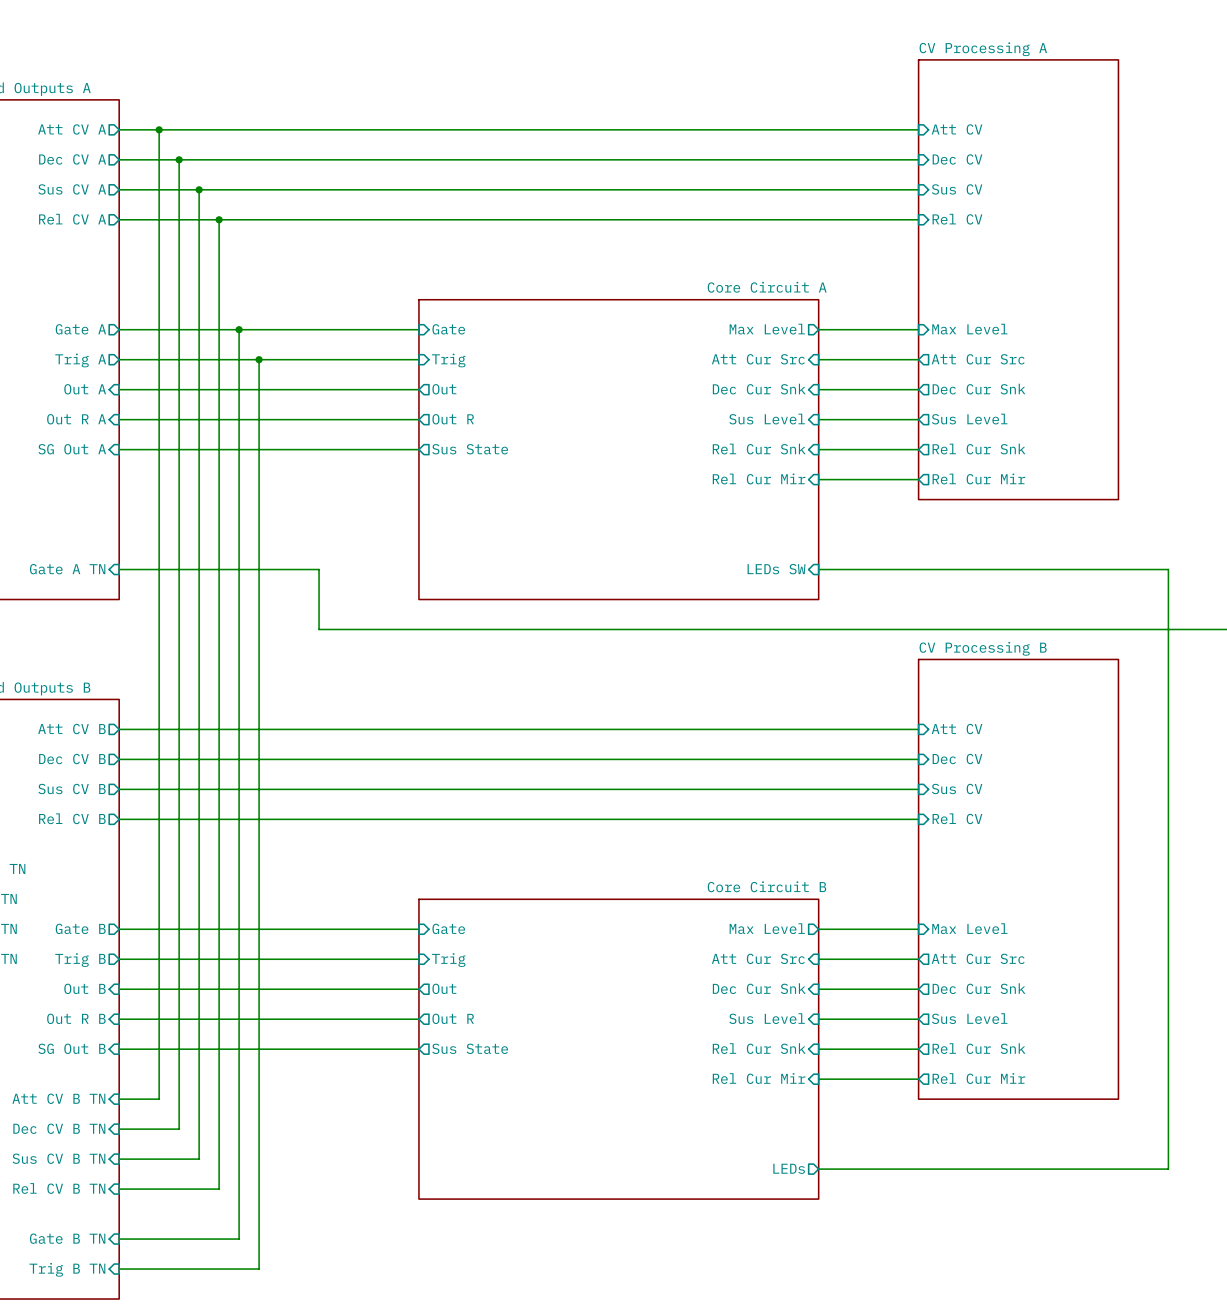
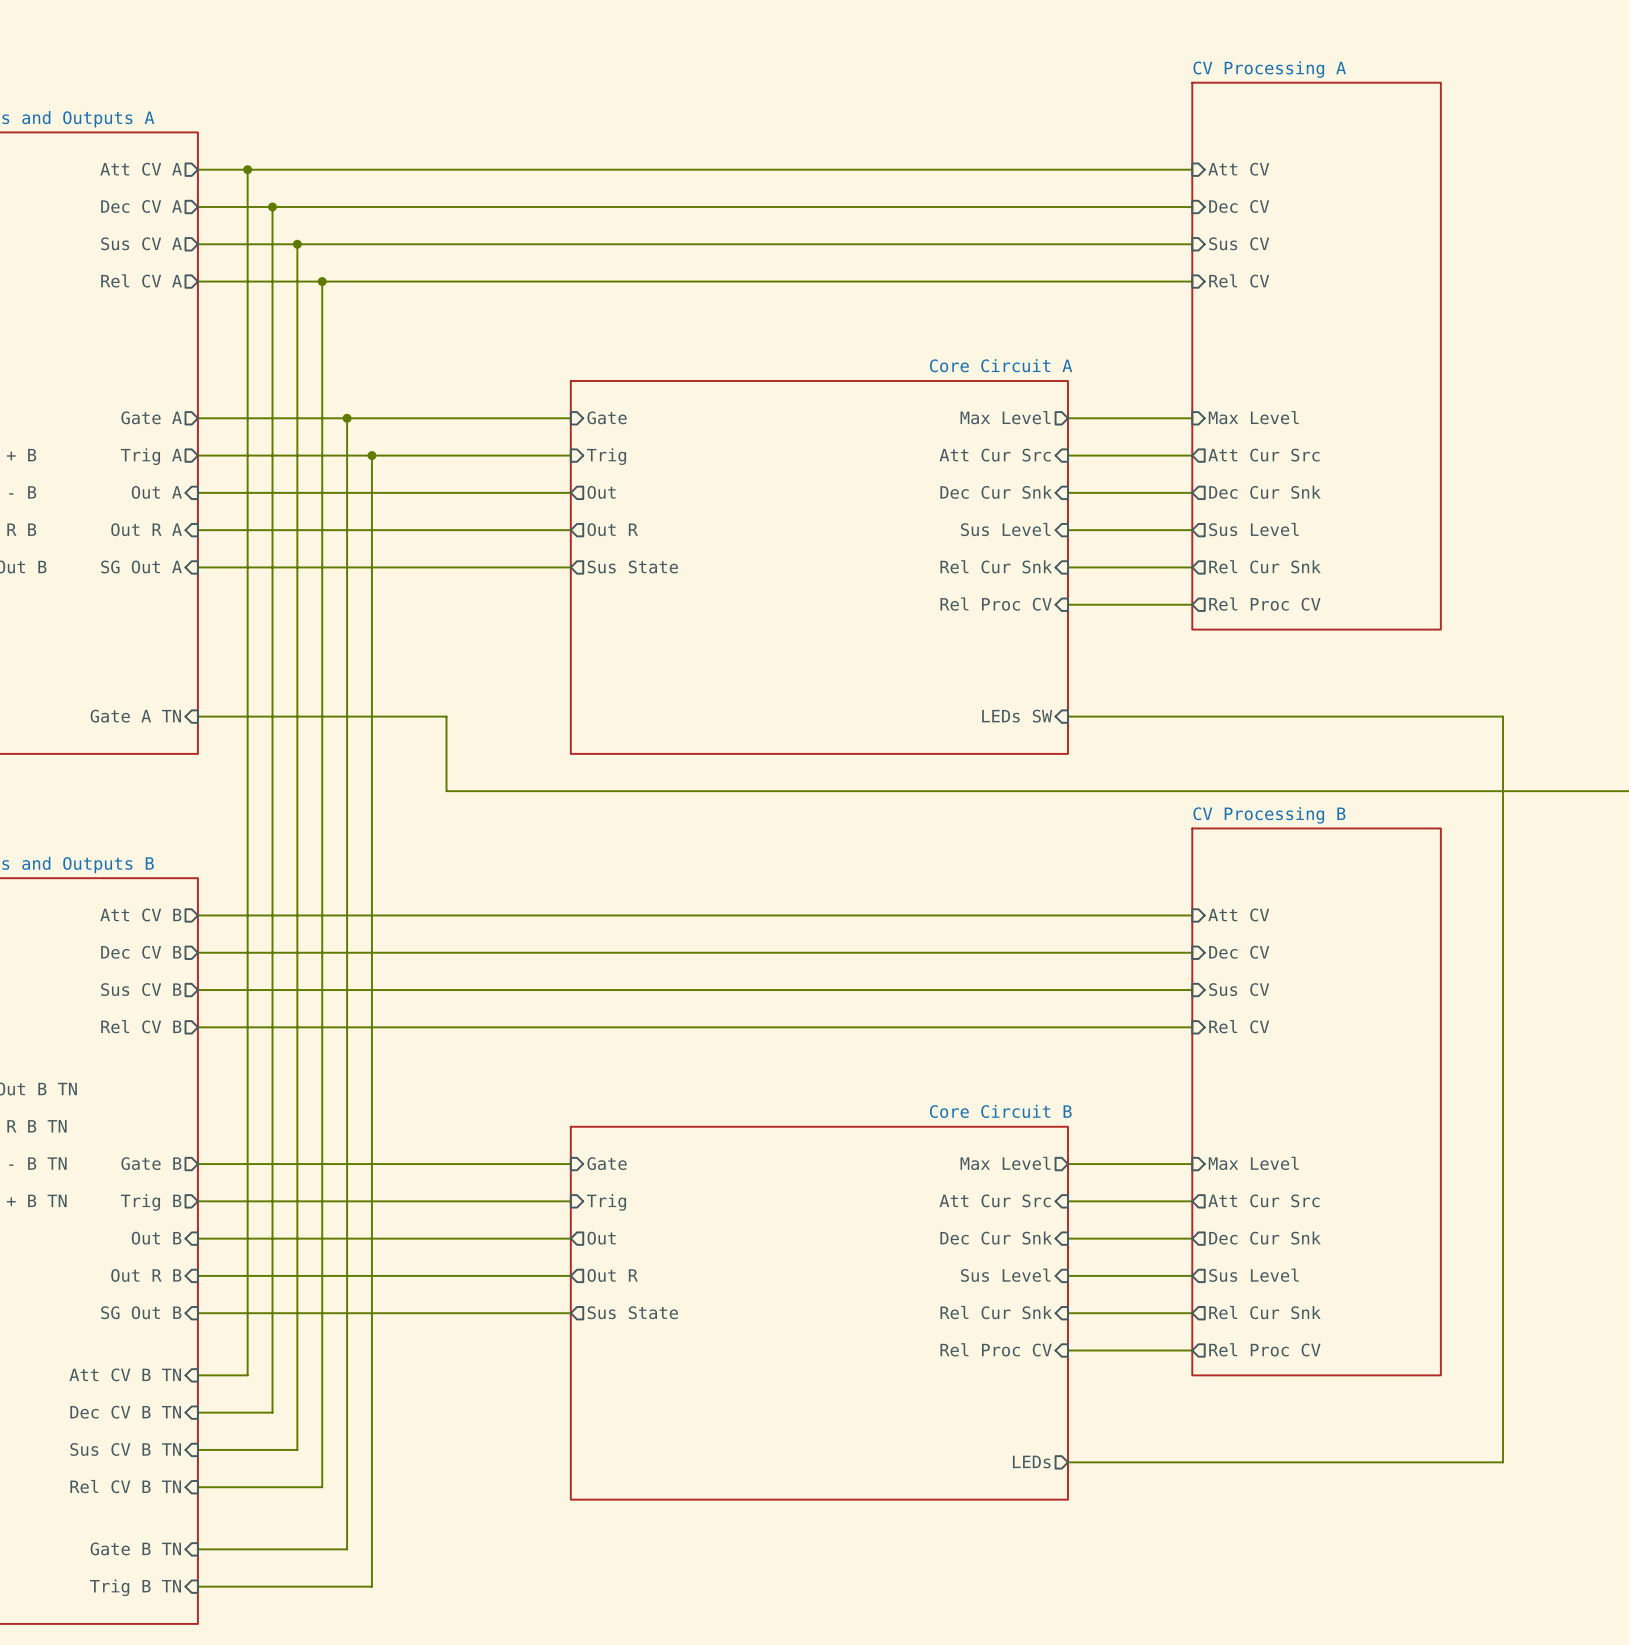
sheet pin: Rel Cur Mir (759, 478) -> Rel Proc CV (996, 604)
sheet pin: Rel Cur Mir (978, 478) -> Rel Proc CV (1264, 604)
sheet pin: Rel Cur Mir (759, 1078) -> Rel Proc CV (996, 1349)
sheet pin: Rel Cur Mir (978, 1078) -> Rel Proc CV (1264, 1349)

